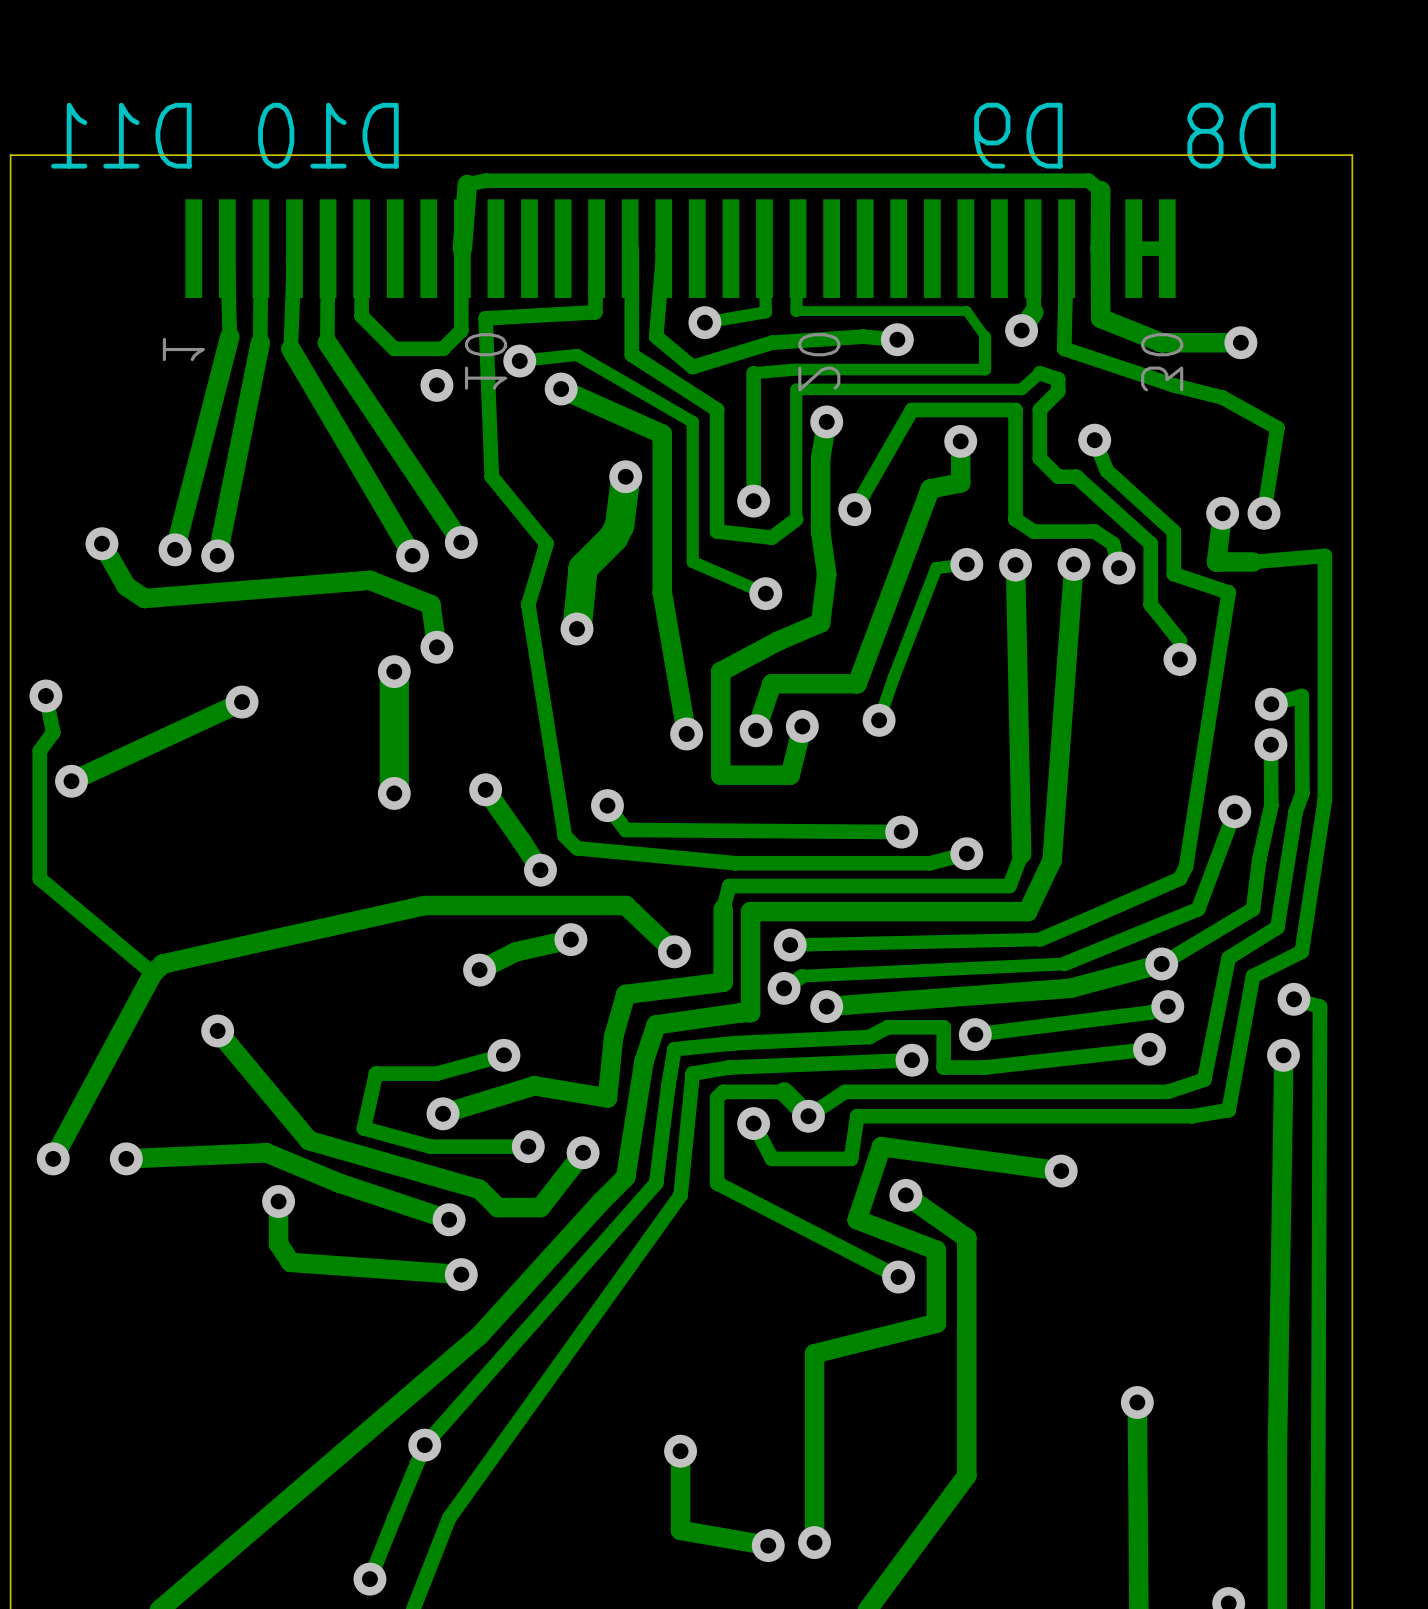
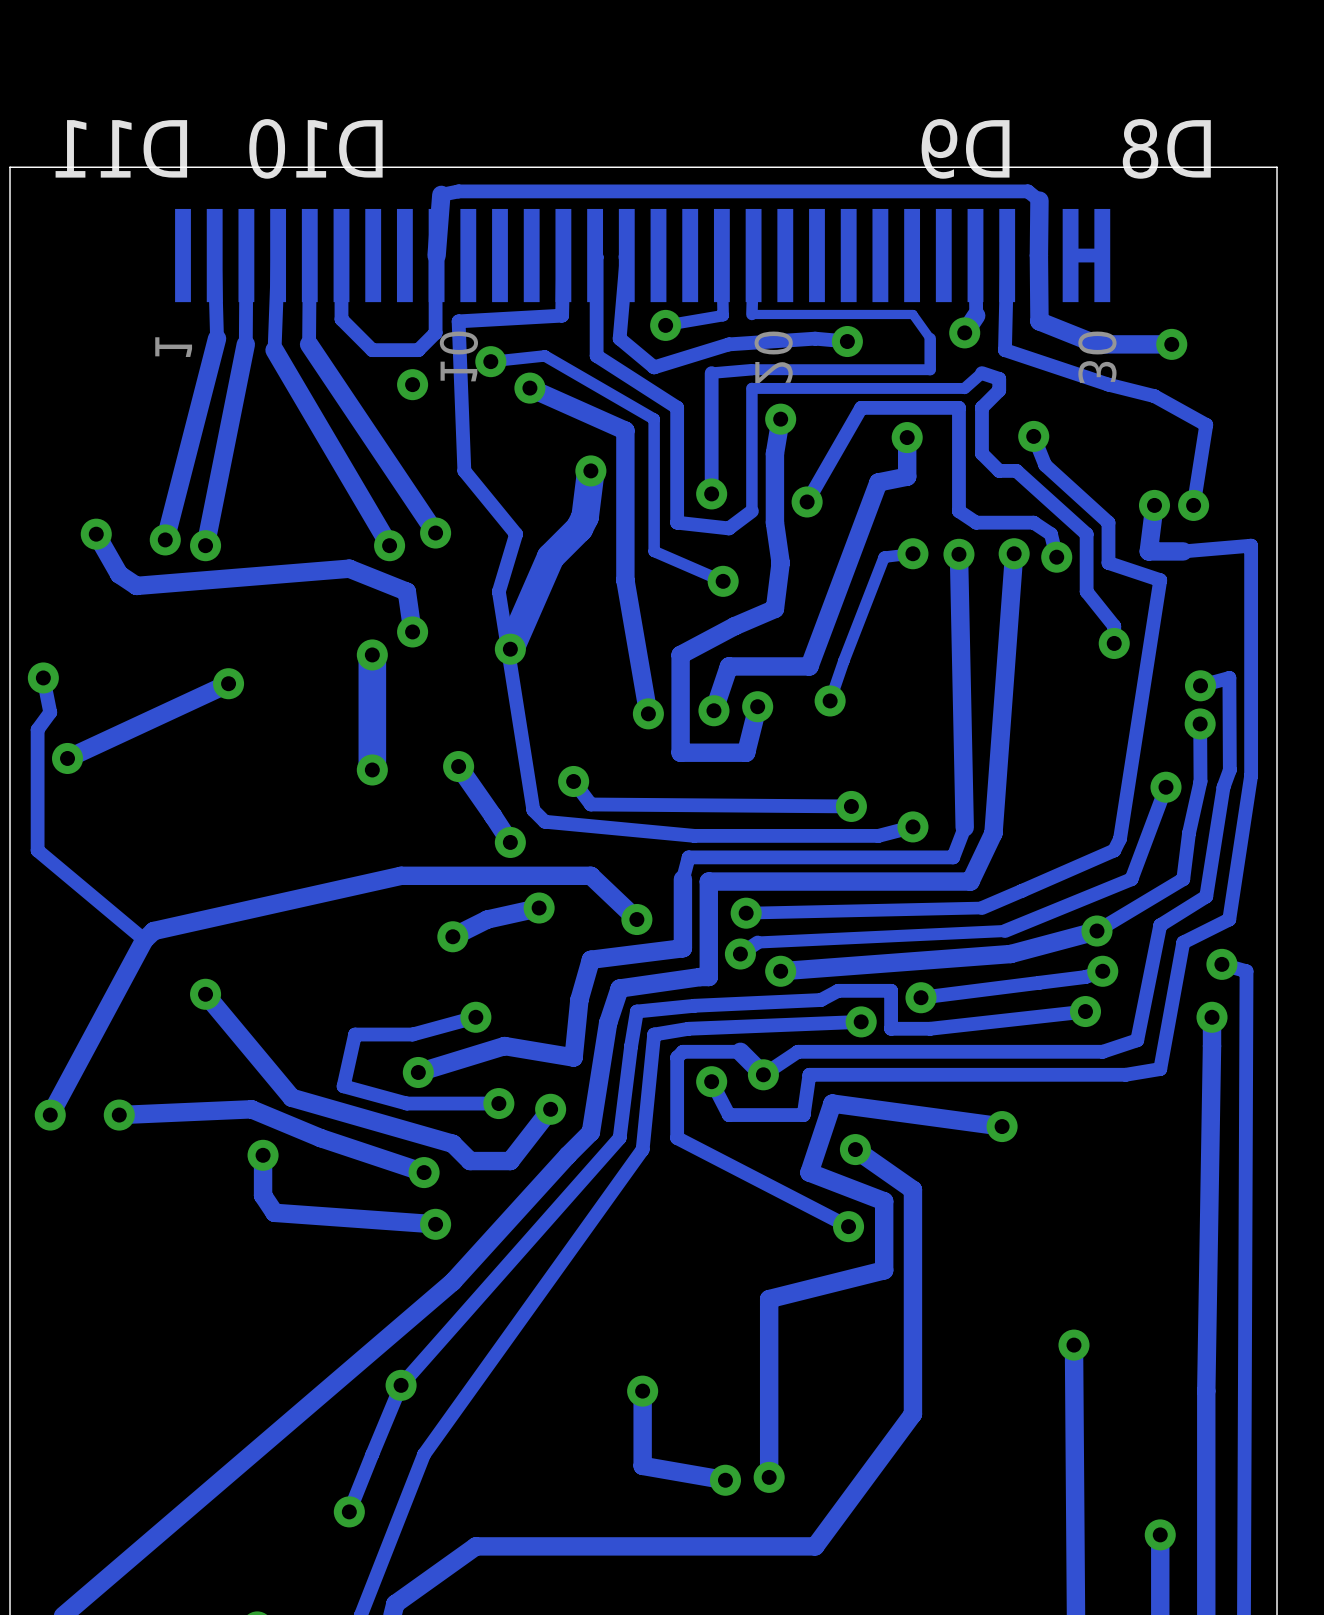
track: (583, 568) (577, 629) -> (550, 557) (510, 649)
via position: (577, 629) -> (510, 649)

